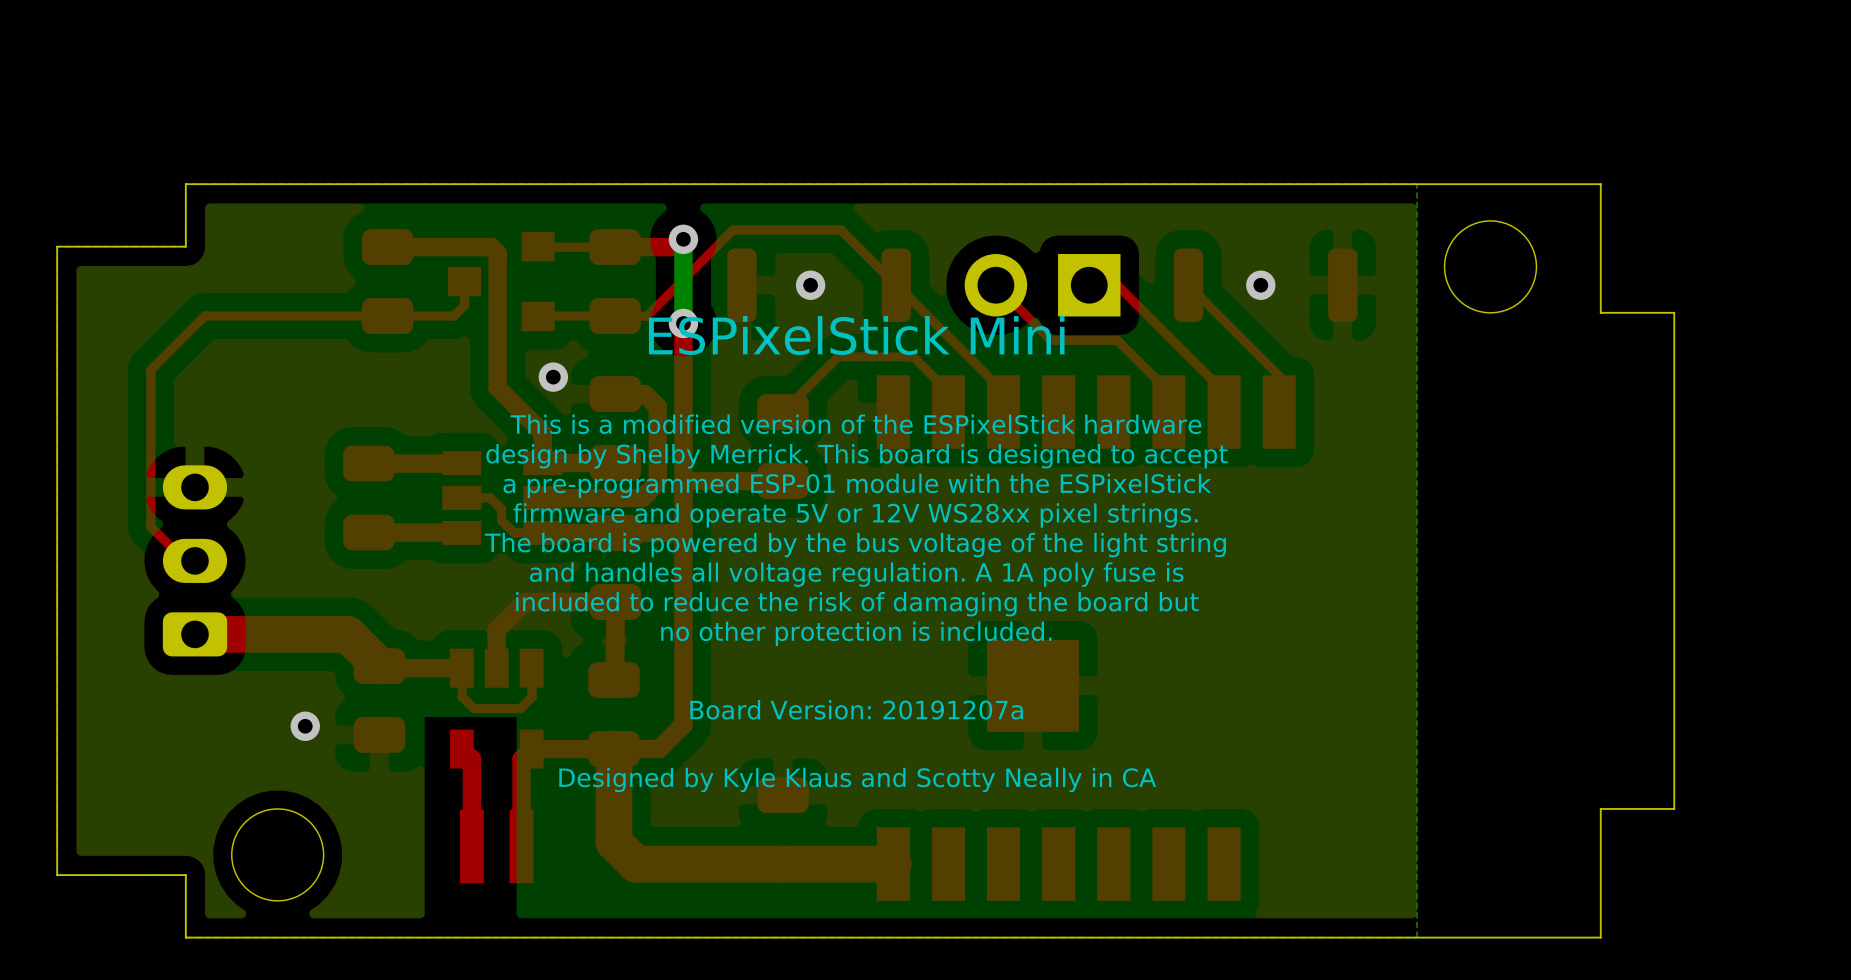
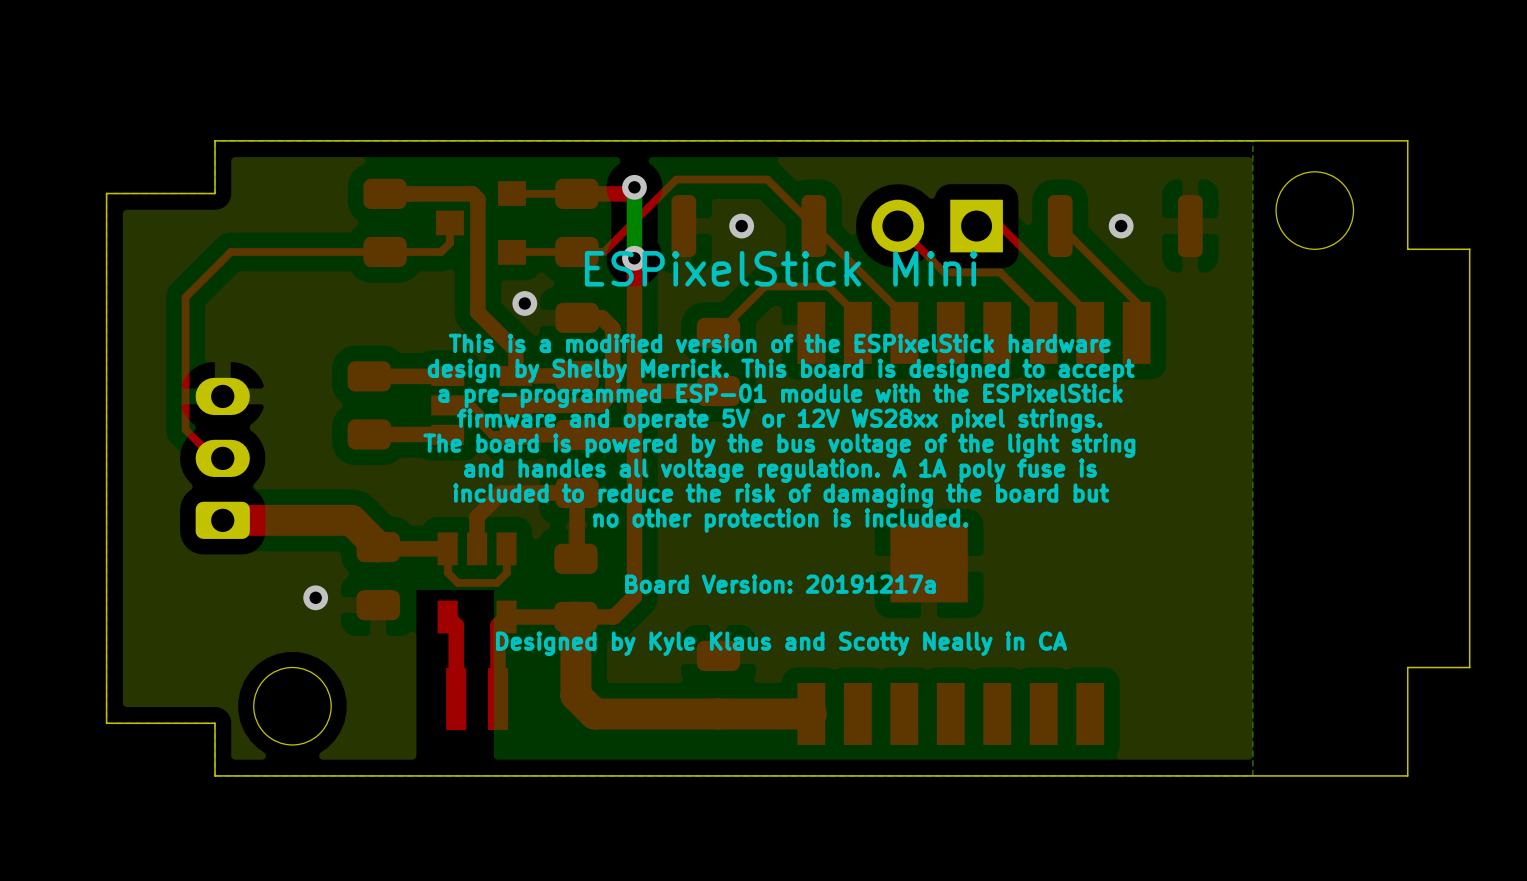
text: Board Version: 20191207a (856, 709) -> Board Version: 20191217a (780, 584)

